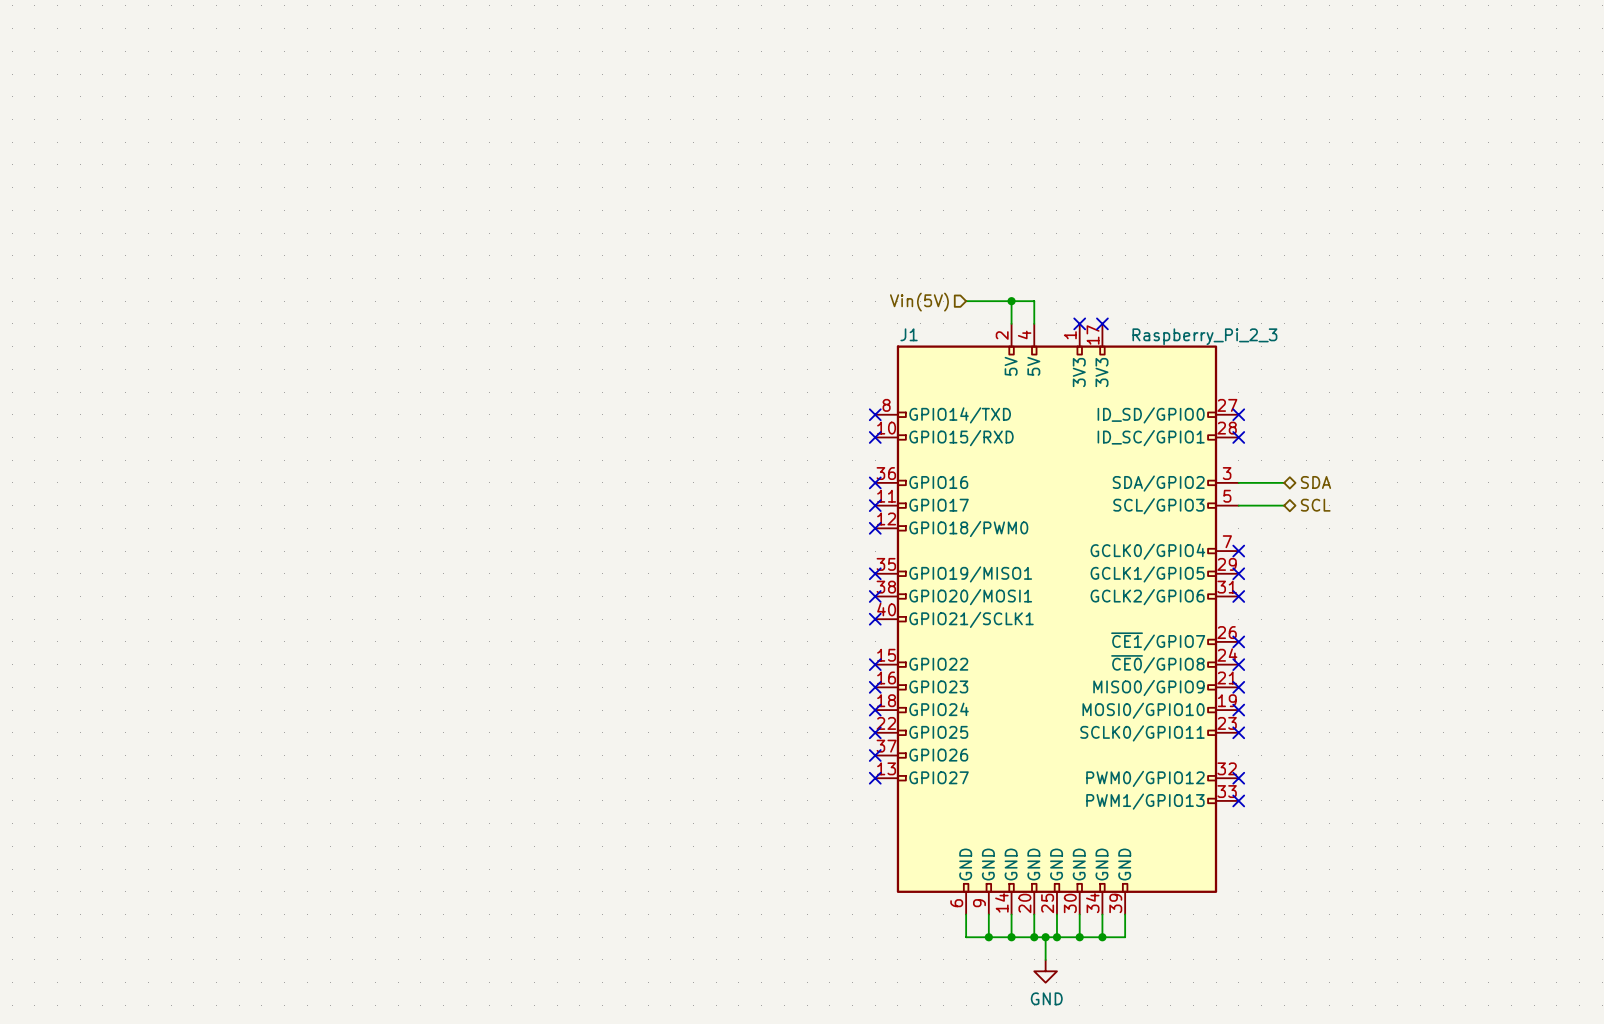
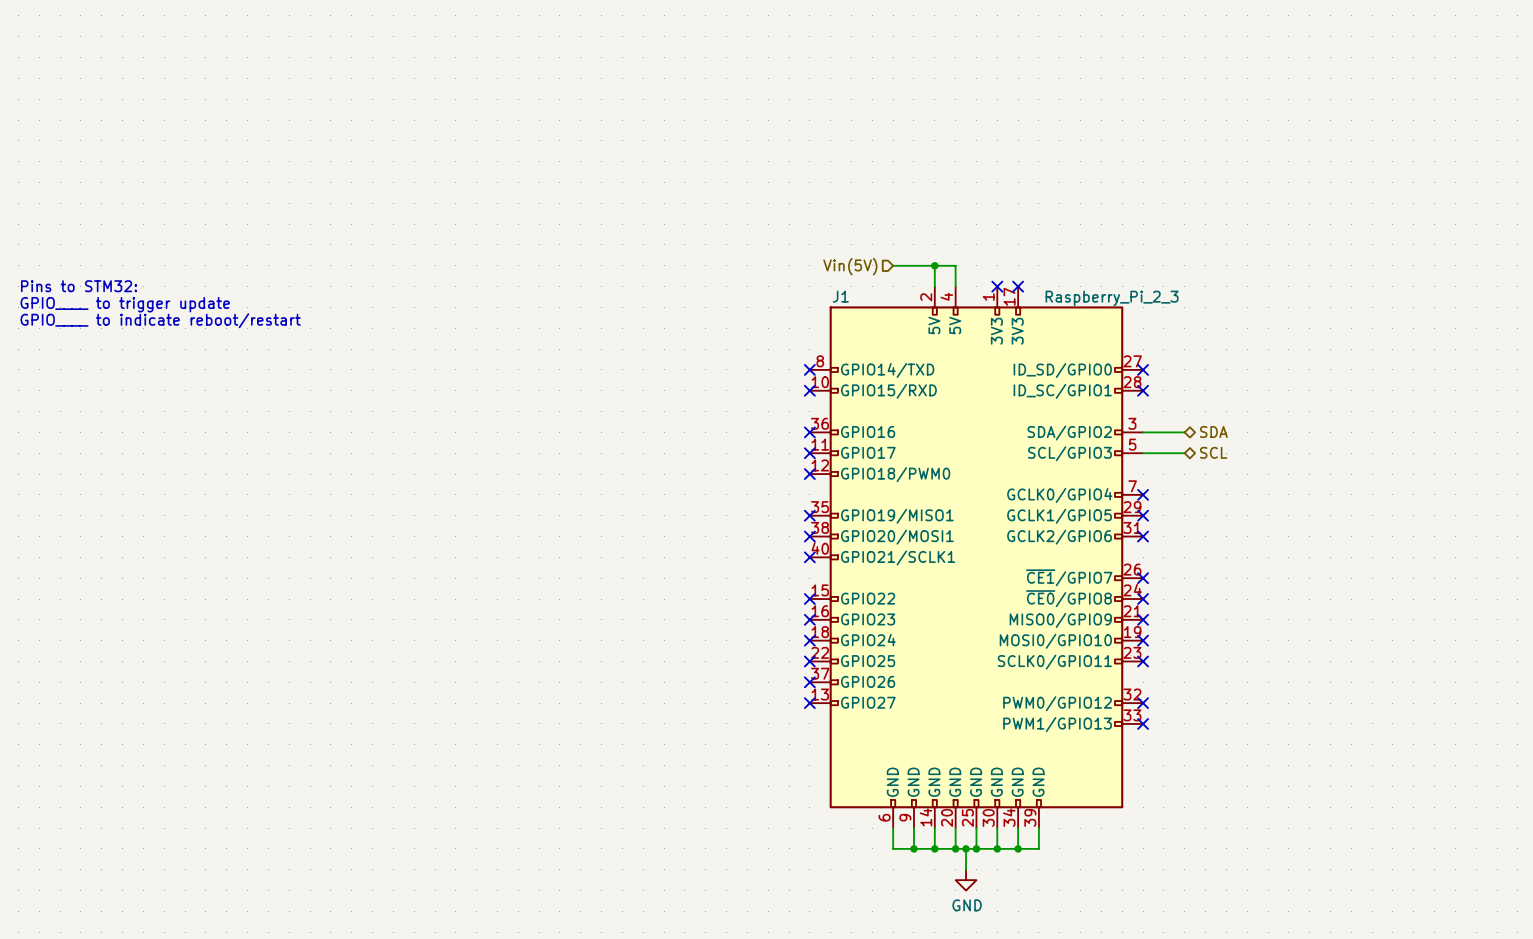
text: none -> Pins to STM32: (79, 286)
text: none -> GPIO____ to trigger update (125, 304)
text: none -> GPIO____ to indicate reboot/restart (160, 320)

